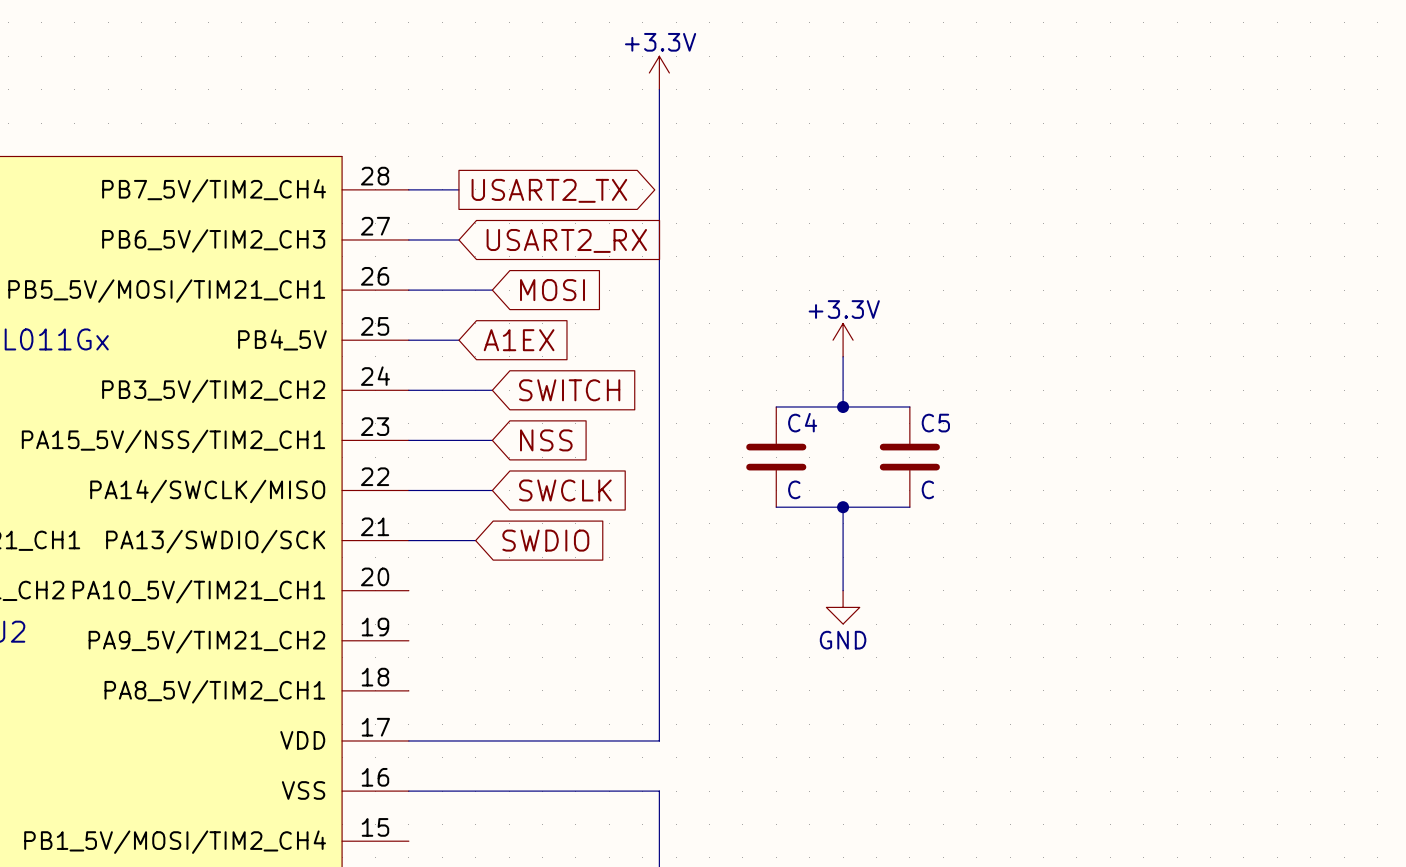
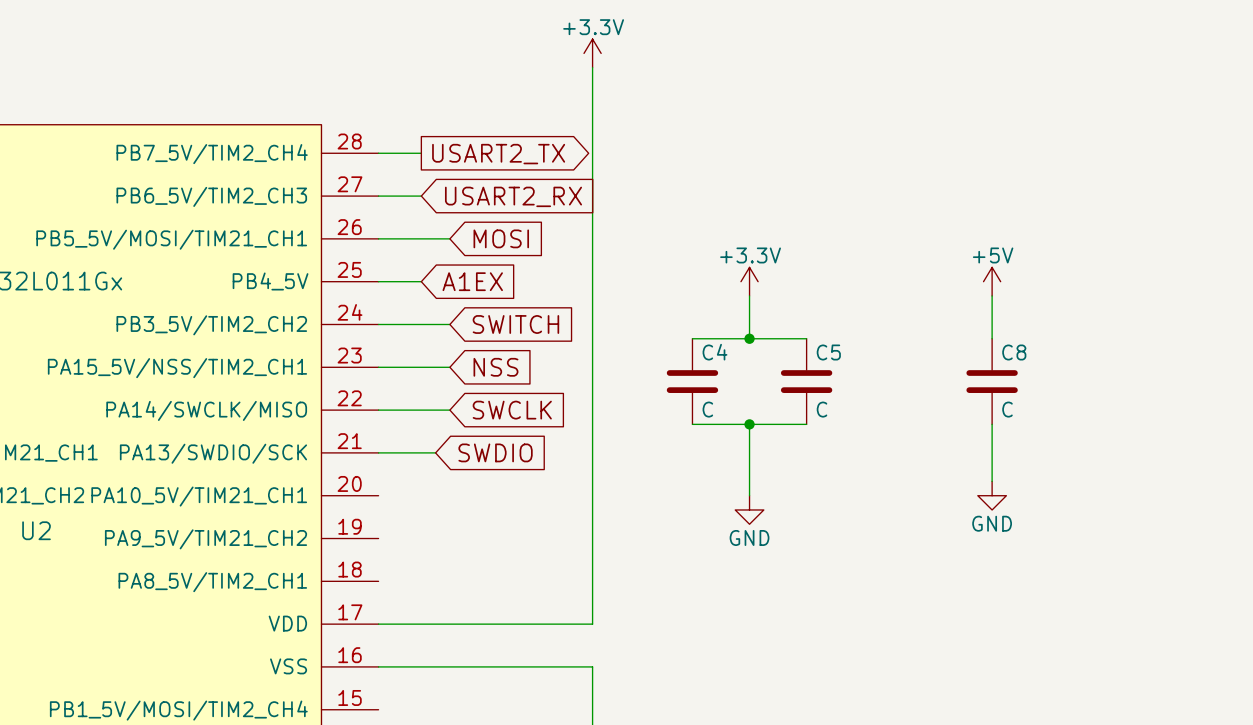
power symbol: none -> +5V (992, 281)
wire: none -> (992, 295) (992, 338)
C8: none -> C (992, 381)
wire: none -> (992, 424) (992, 481)
power symbol: none -> GND (992, 495)

